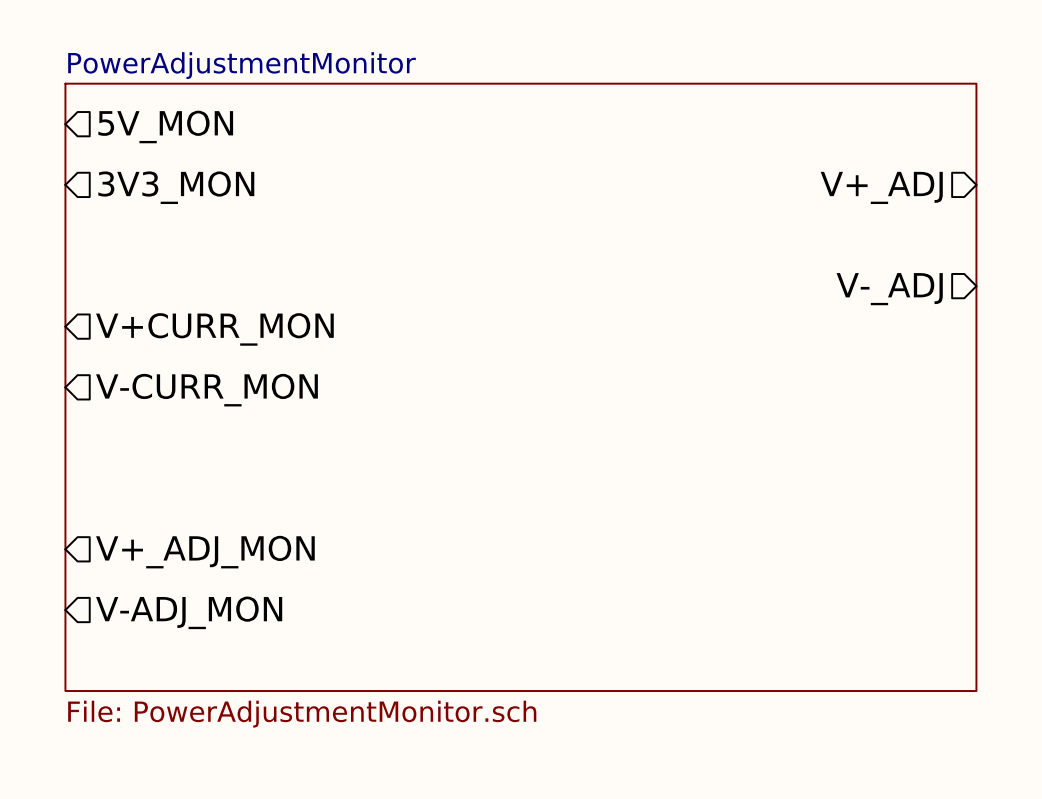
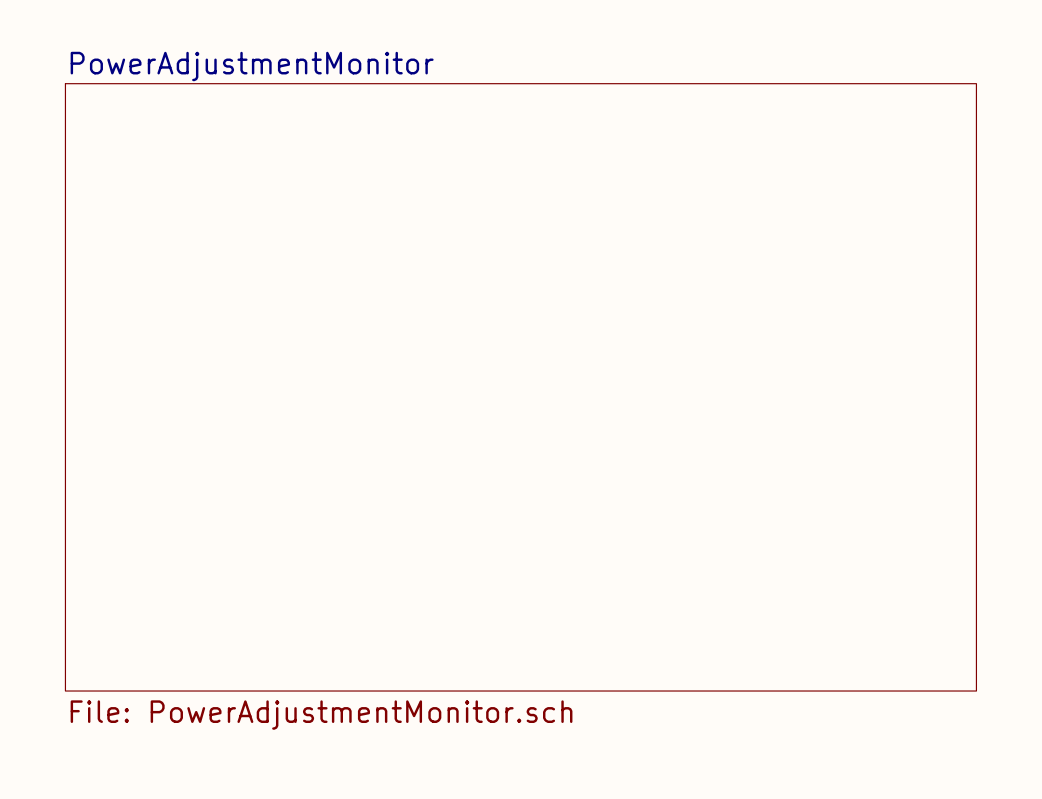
sheet pin: 5V_MON (165, 126) -> none
sheet pin: 3V3_MON (176, 187) -> none
sheet pin: V+_ADJ (881, 187) -> none
sheet pin: V-_ADJ (889, 289) -> none
sheet pin: V+CURR_MON (214, 329) -> none
sheet pin: V-CURR_MON (206, 390) -> none
sheet pin: V+_ADJ_MON (205, 552) -> none
sheet pin: V-ADJ_MON (189, 612) -> none

